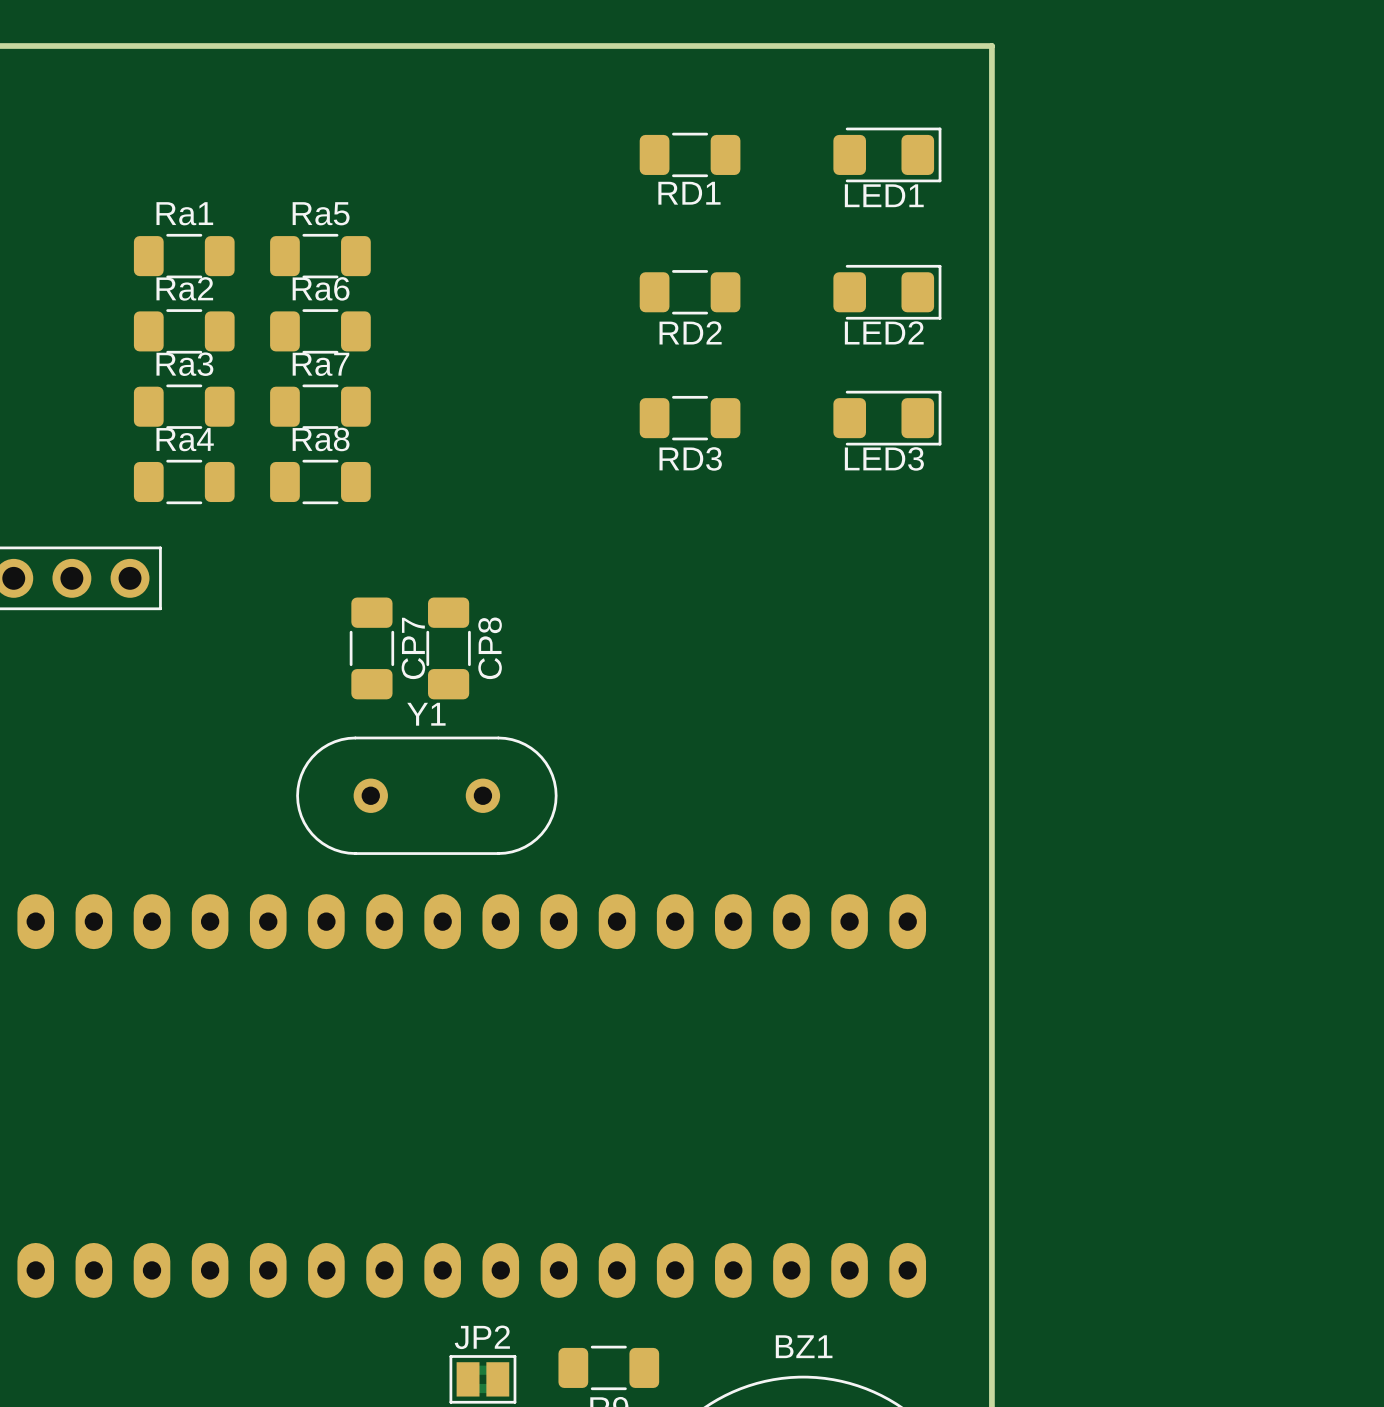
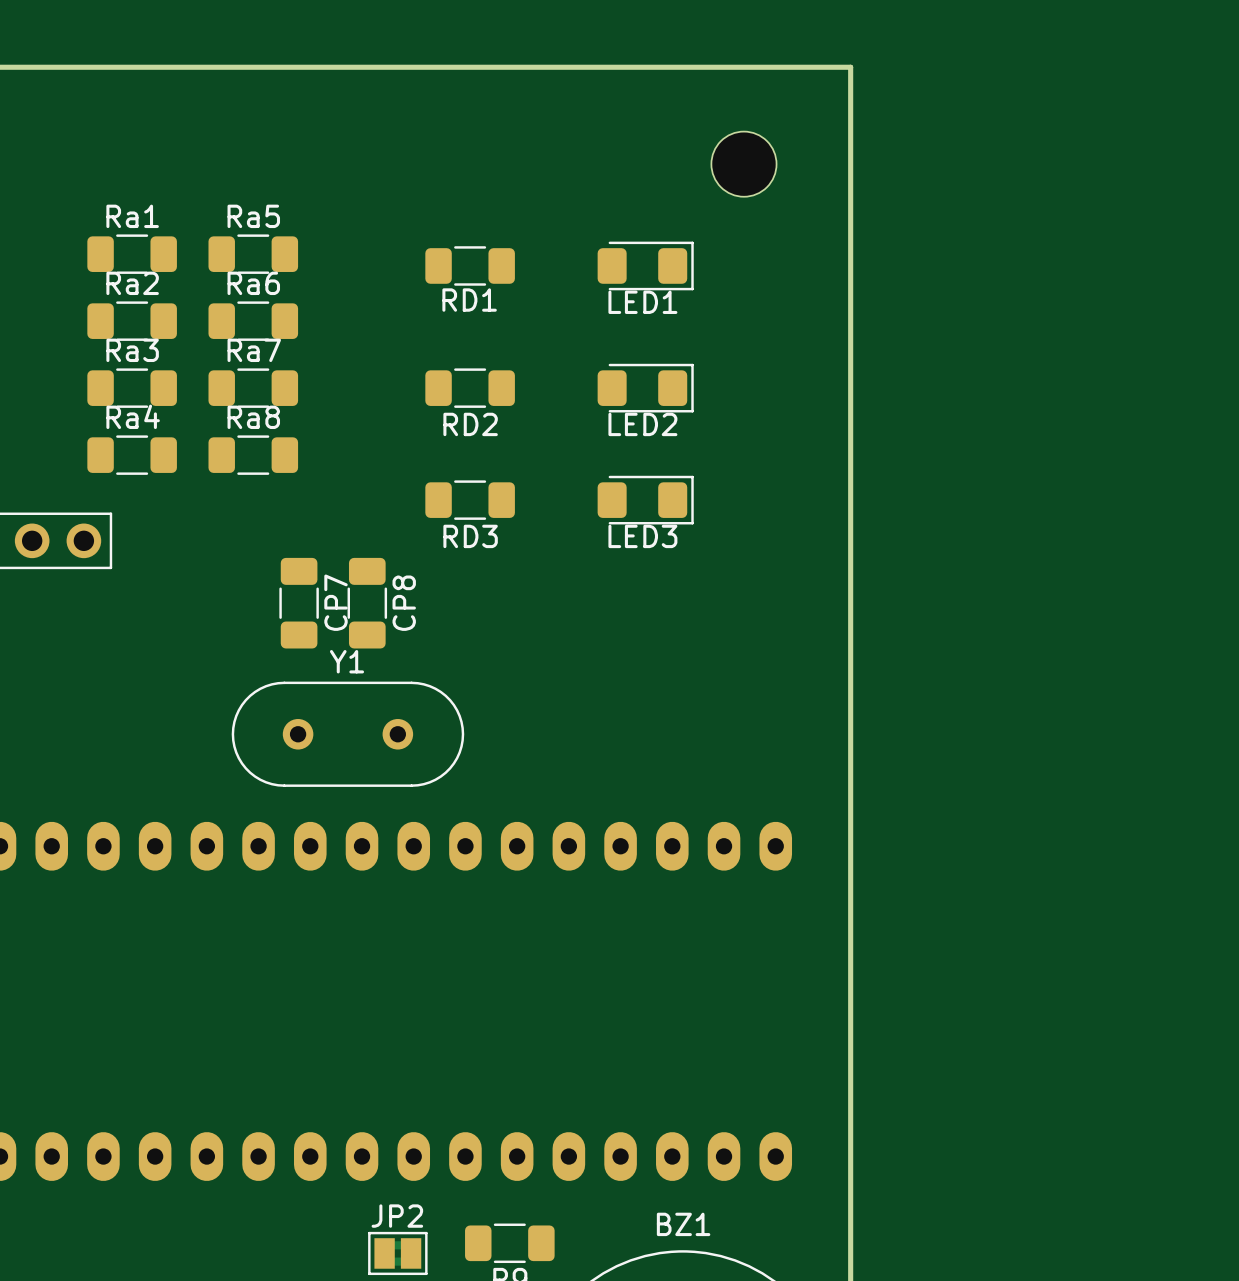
RD1 position: (690, 154) -> (470, 265)
part: none -> (743, 164)
LED1 position: (887, 154) -> (645, 265)
RD2 position: (690, 292) -> (470, 388)
LED2 position: (887, 292) -> (645, 388)
RD3 position: (690, 418) -> (470, 500)
LED3 position: (887, 418) -> (645, 500)

